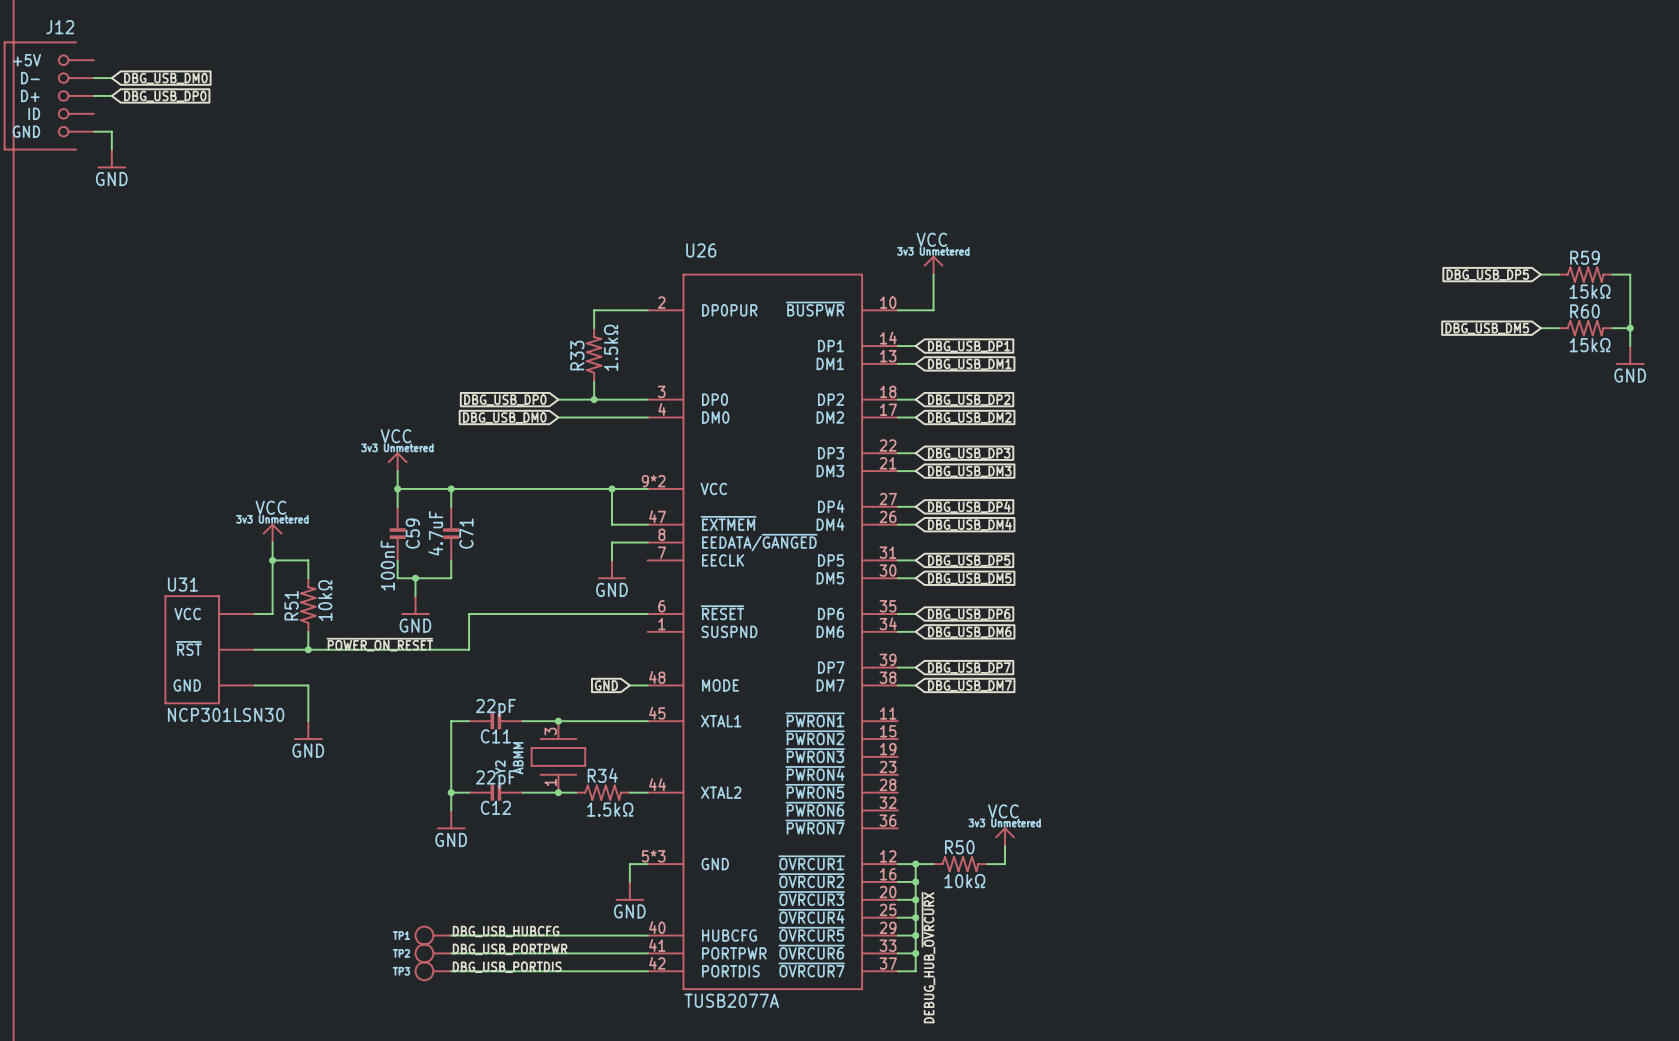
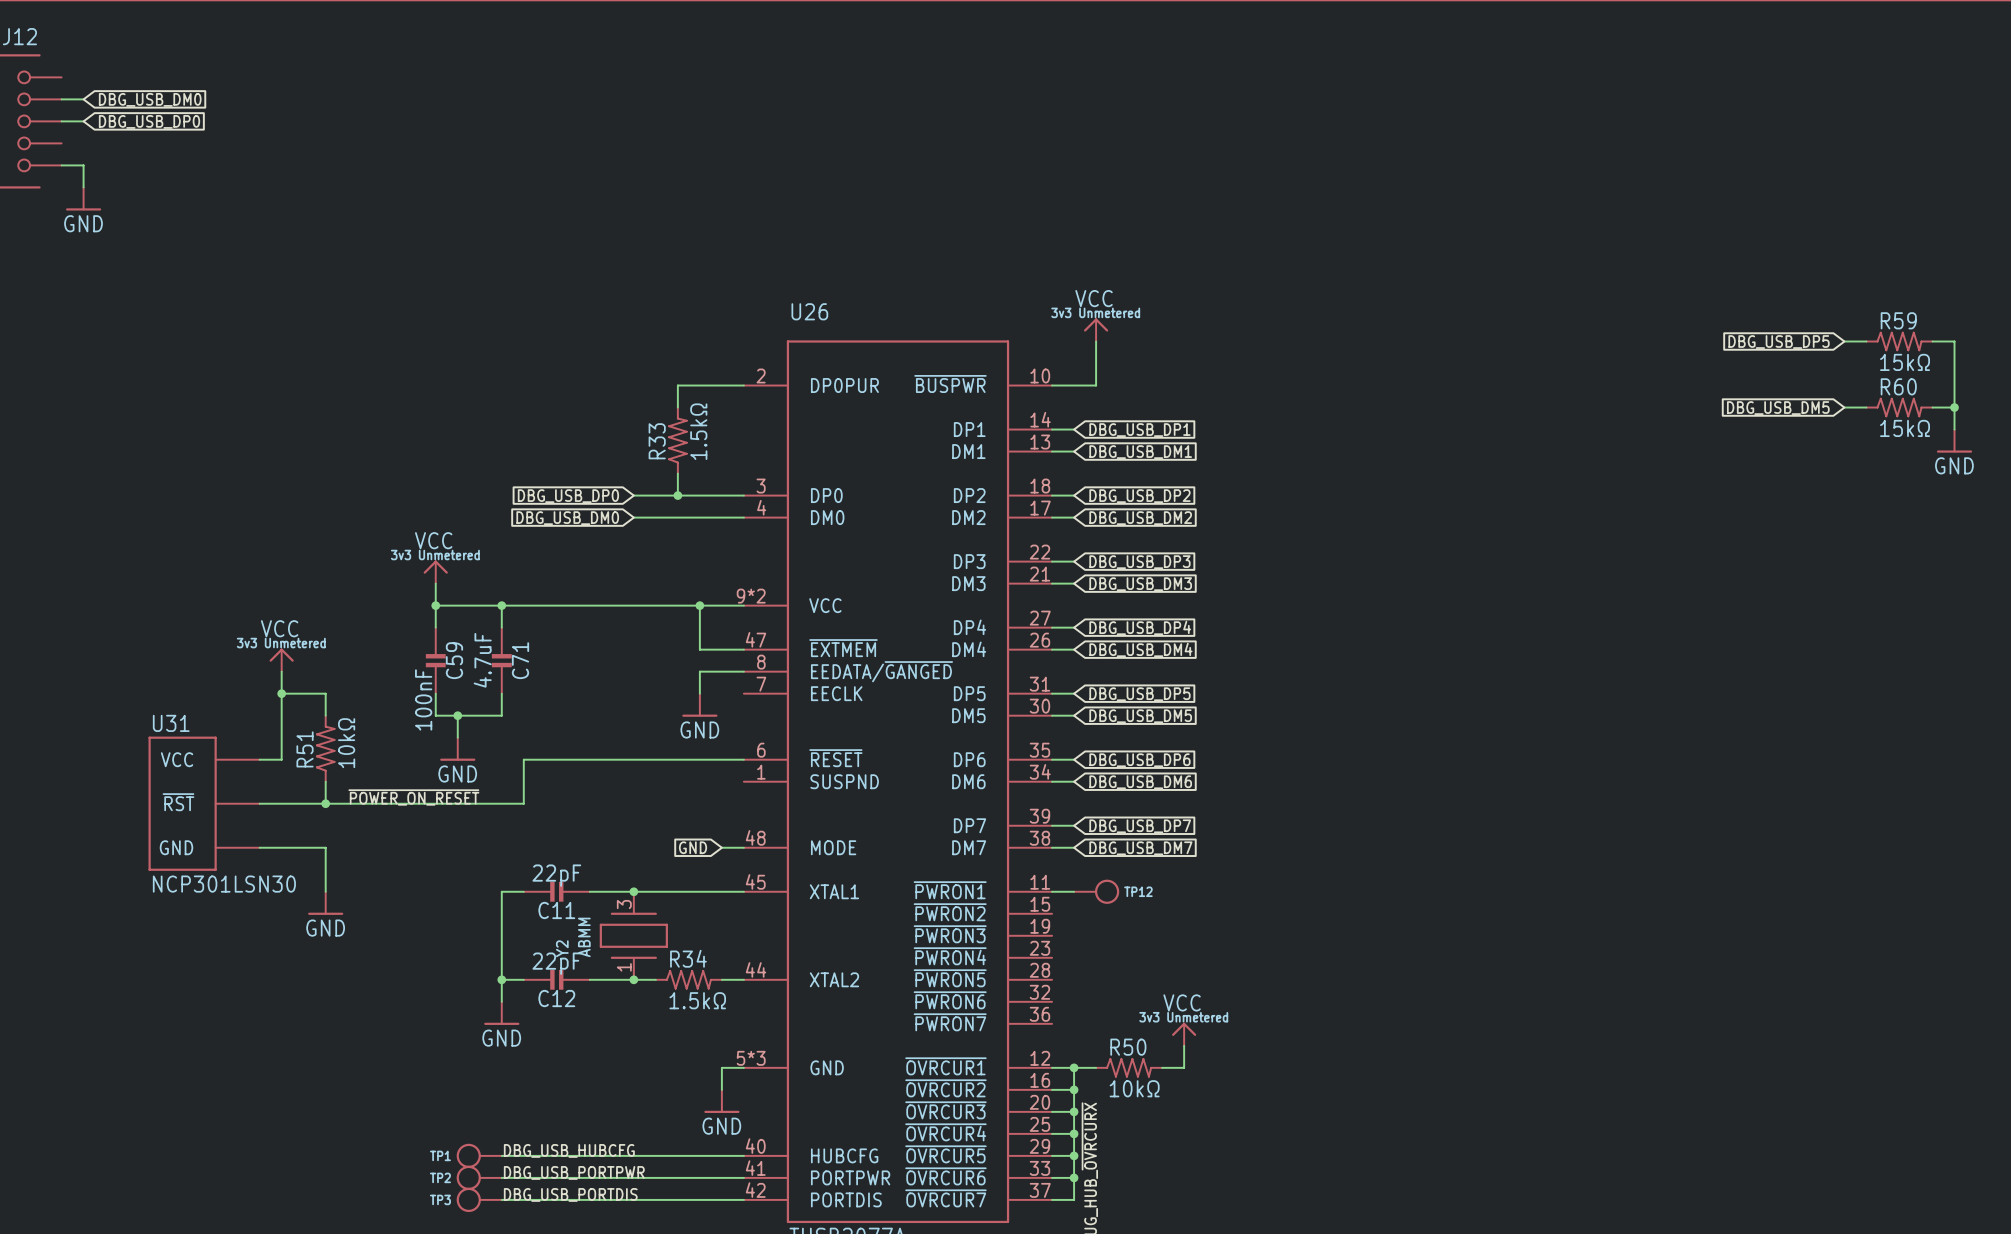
wire: none -> (1052, 891) (1074, 891)
TP12: none -> (1096, 891)

